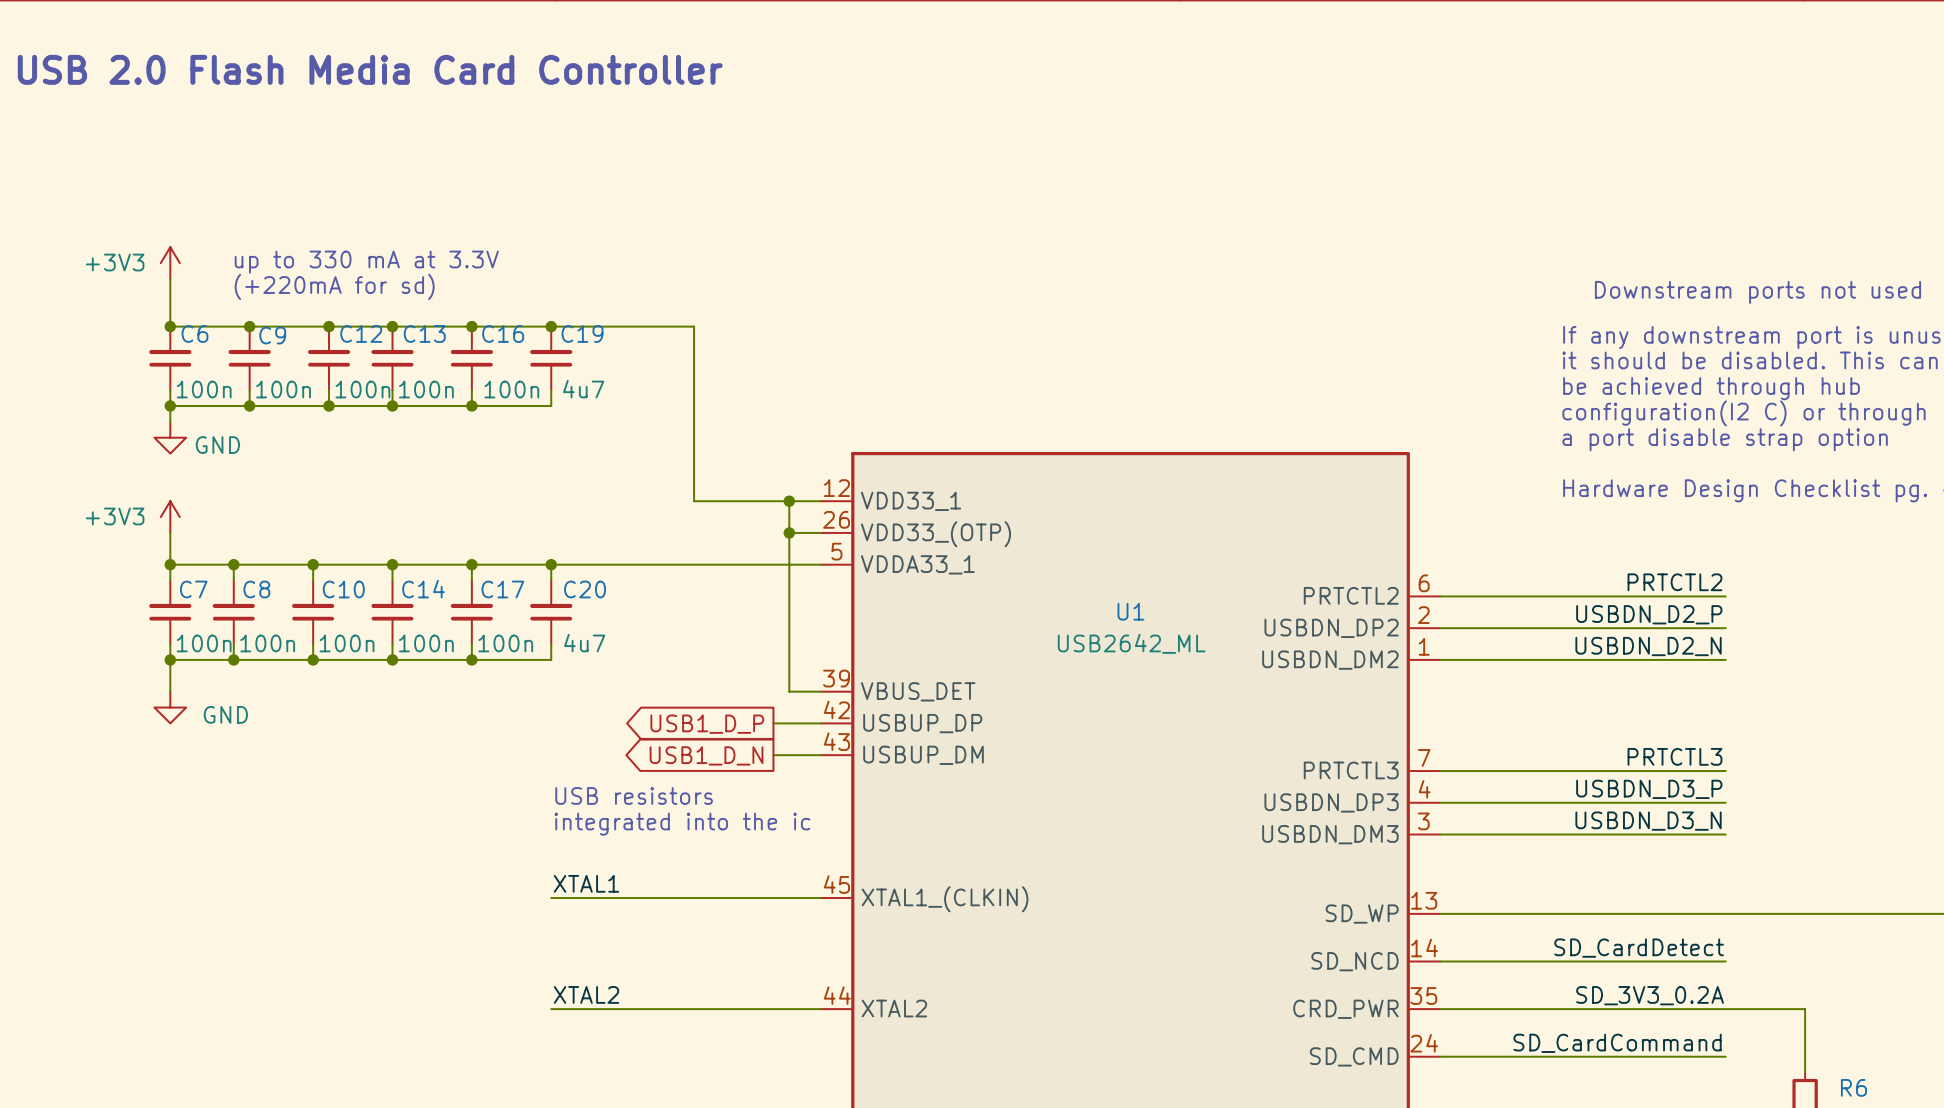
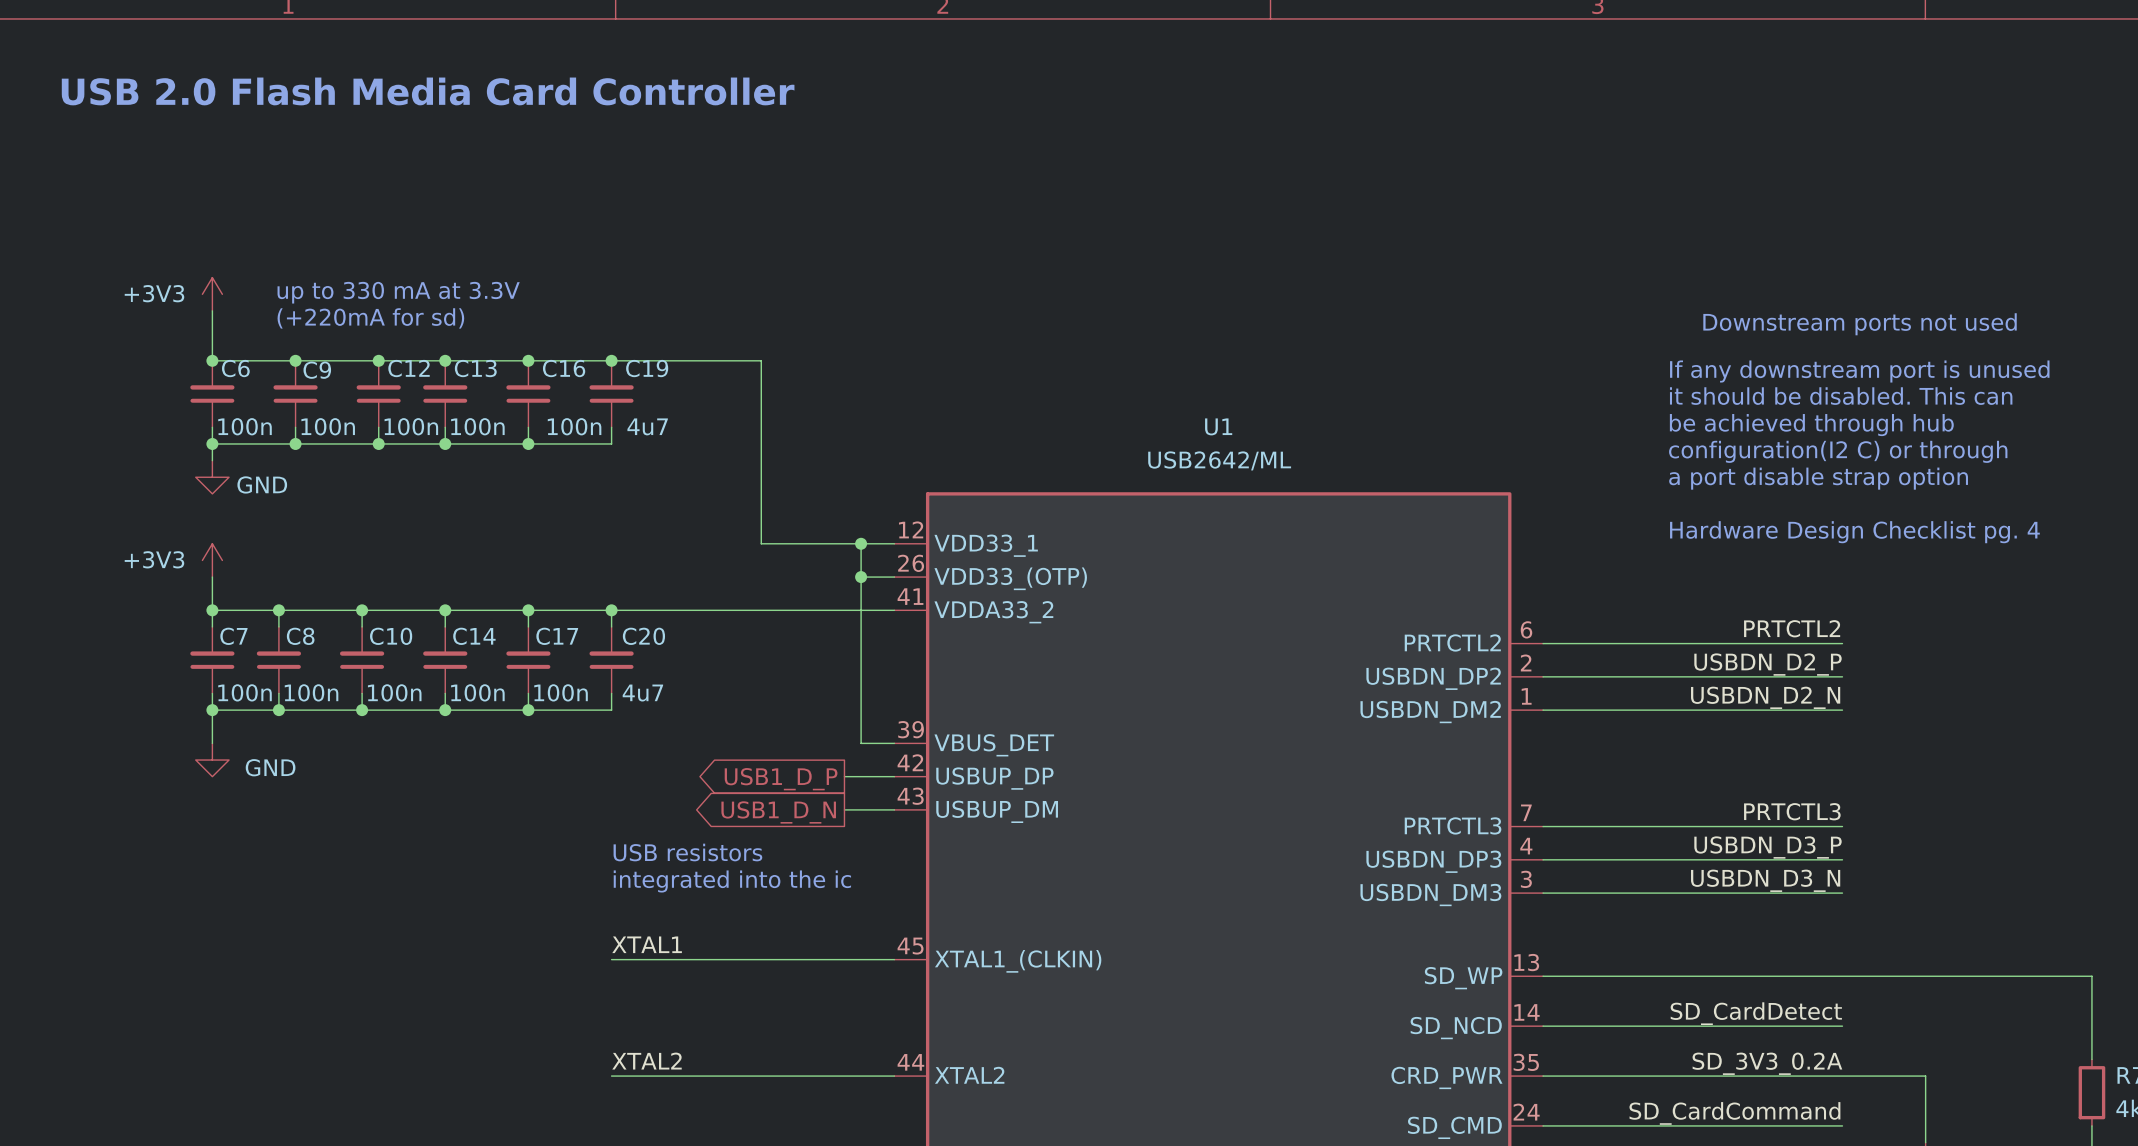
U1 text: none -> USB2642/ML (1219, 460)
U1 pin number: 5 (836, 551) -> 41 (910, 596)
U1 pin name: VDDA33_1 (917, 564) -> VDDA33_2 (993, 612)
U1 name position: U1 (1130, 611) -> U1 (1218, 426)
U1 value: USB2642_ML (1131, 643) -> none

